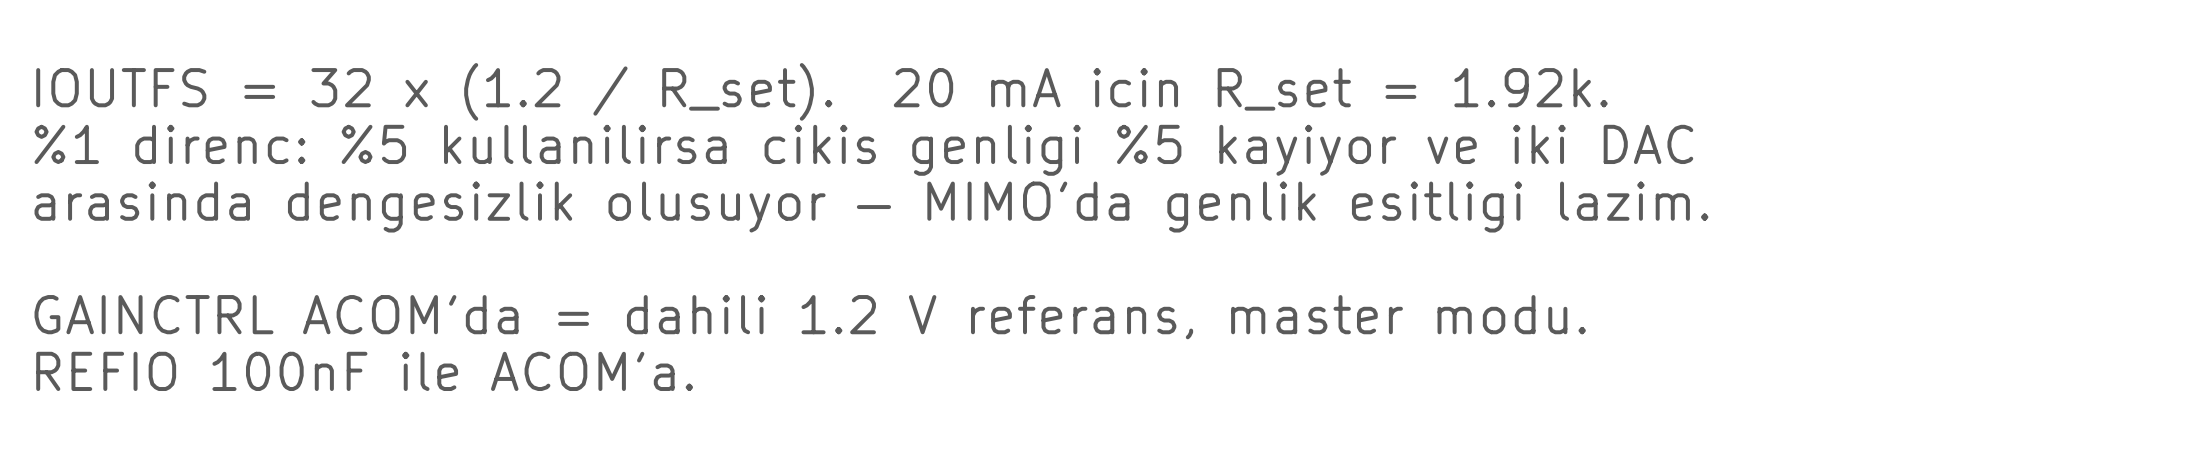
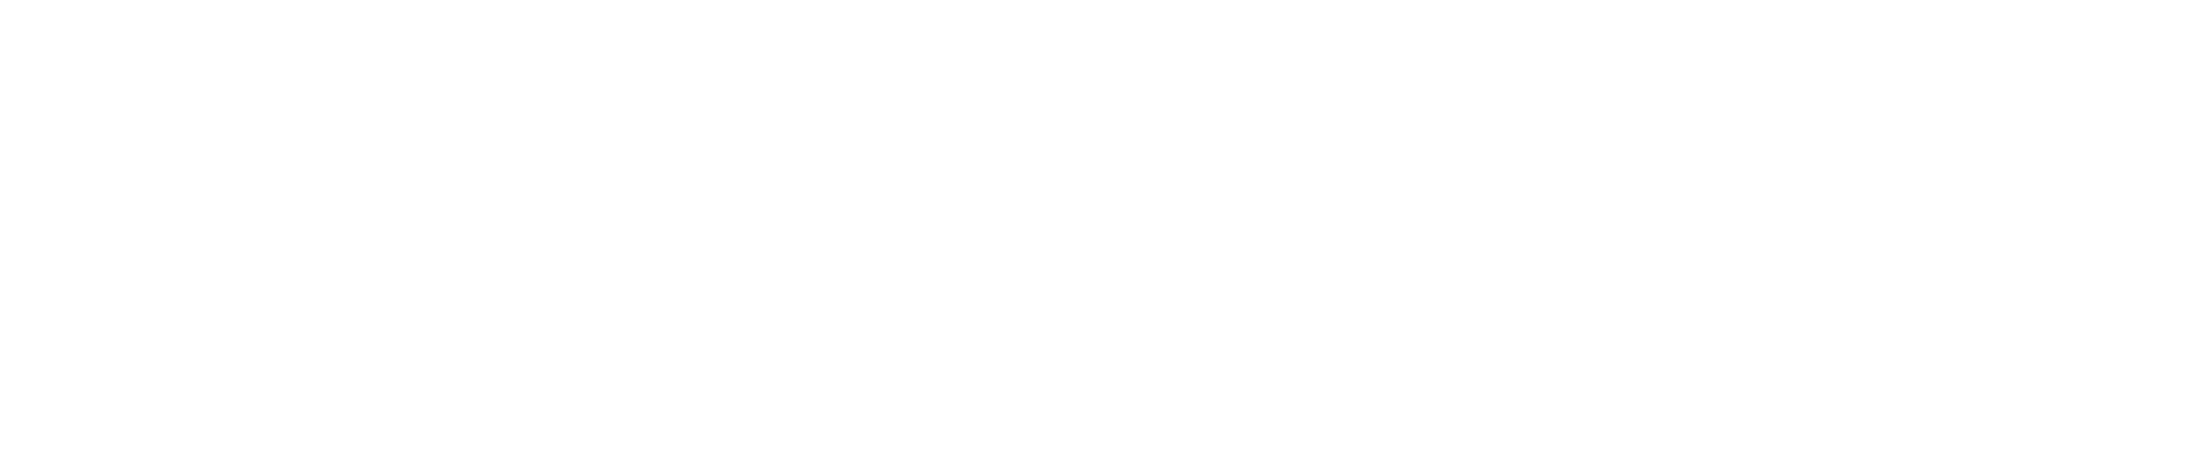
text: IOUTFS = 32 x (1.2 / R_set). 20 mA icin R_set = 1.92k. (821, 91) -> none
text: %1 direnc: %5 kullanilirsa cikis genligi %5 kayiyor ve iki DAC (863, 150) -> none
text: arasinda dengesizlik olusuyor — MIMO'da genlik esitligi lazim. (871, 207) -> none
text: GAINCTRL ACOM'da = dahili 1.2 V referans, master modu. (810, 317) -> none
text: REFIO 100nF ile ACOM'a. (364, 371) -> none

